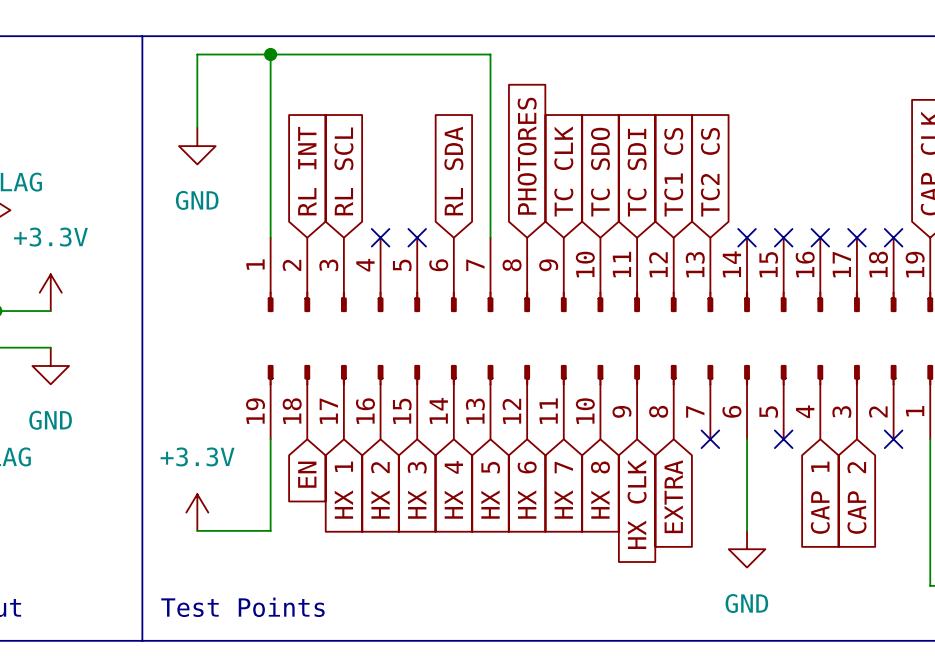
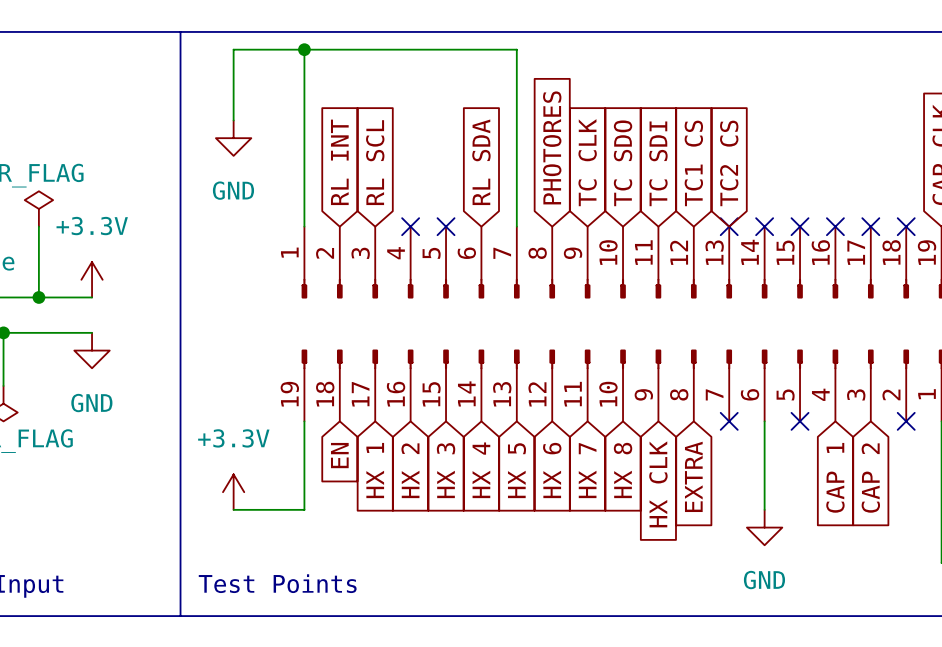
no-connect mark: none -> (729, 226)

